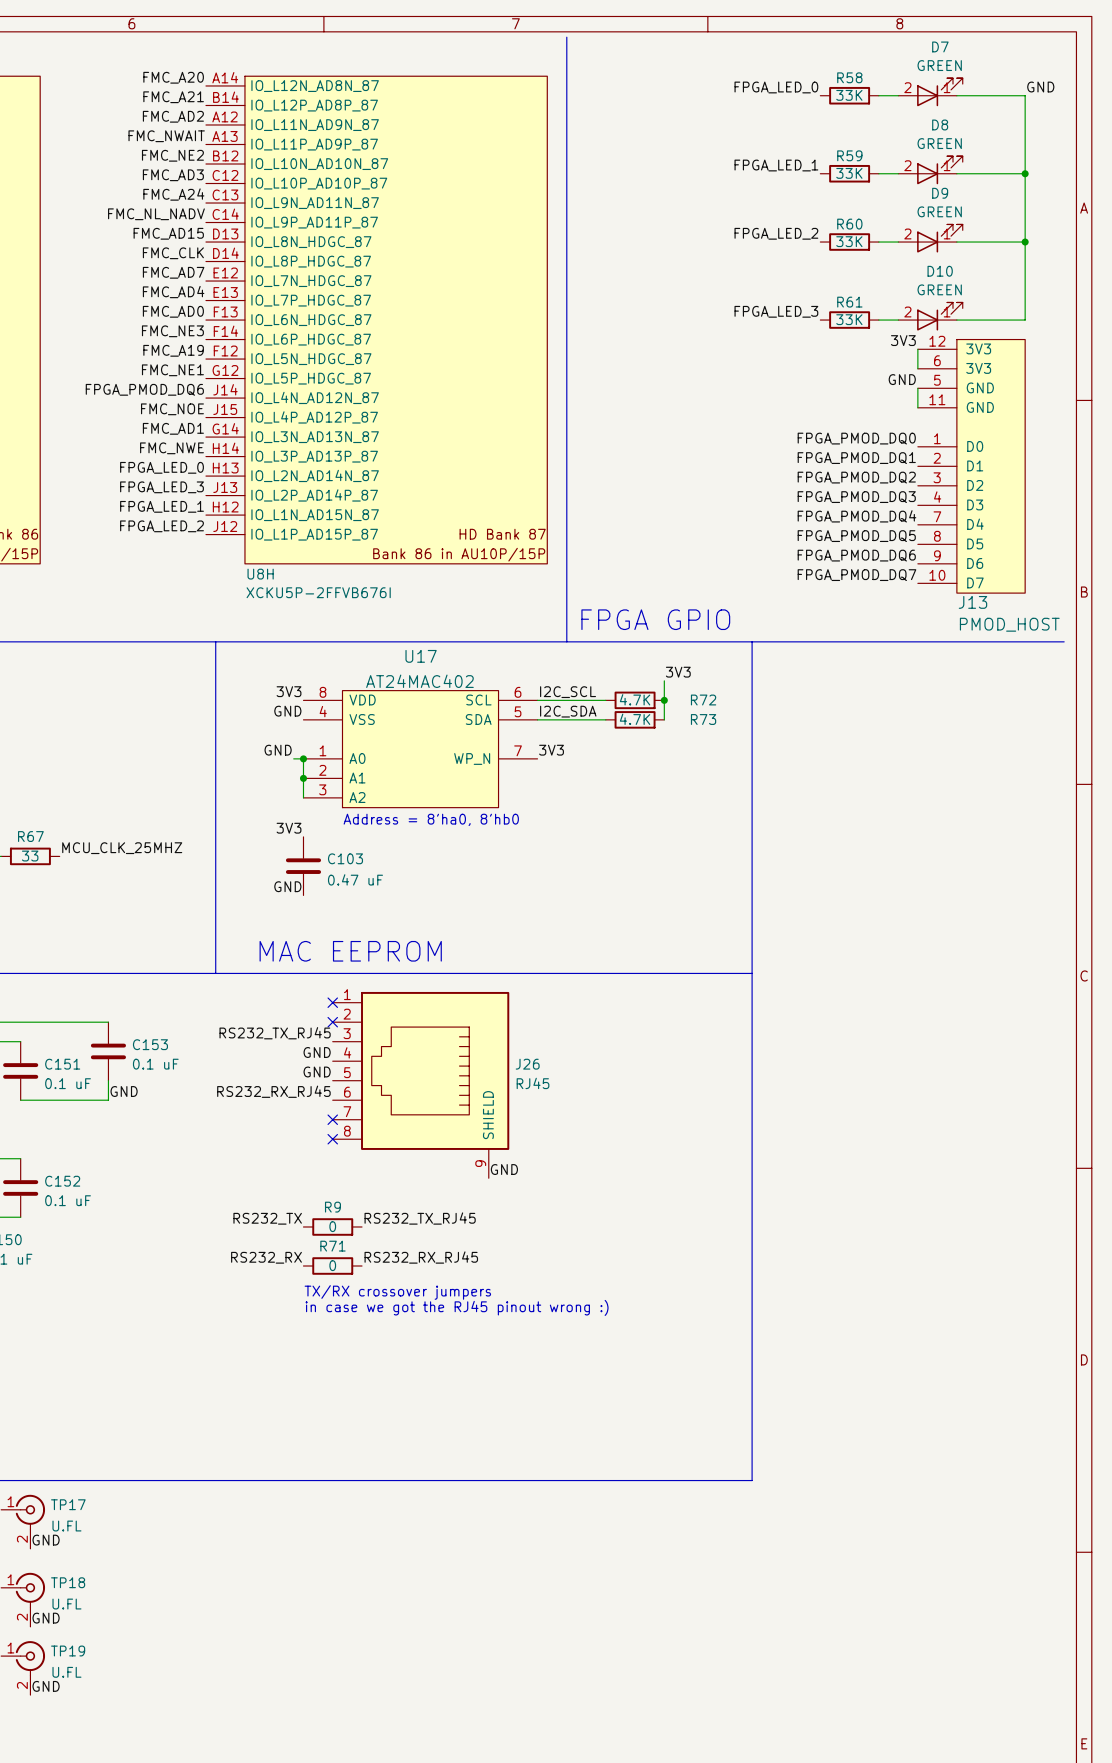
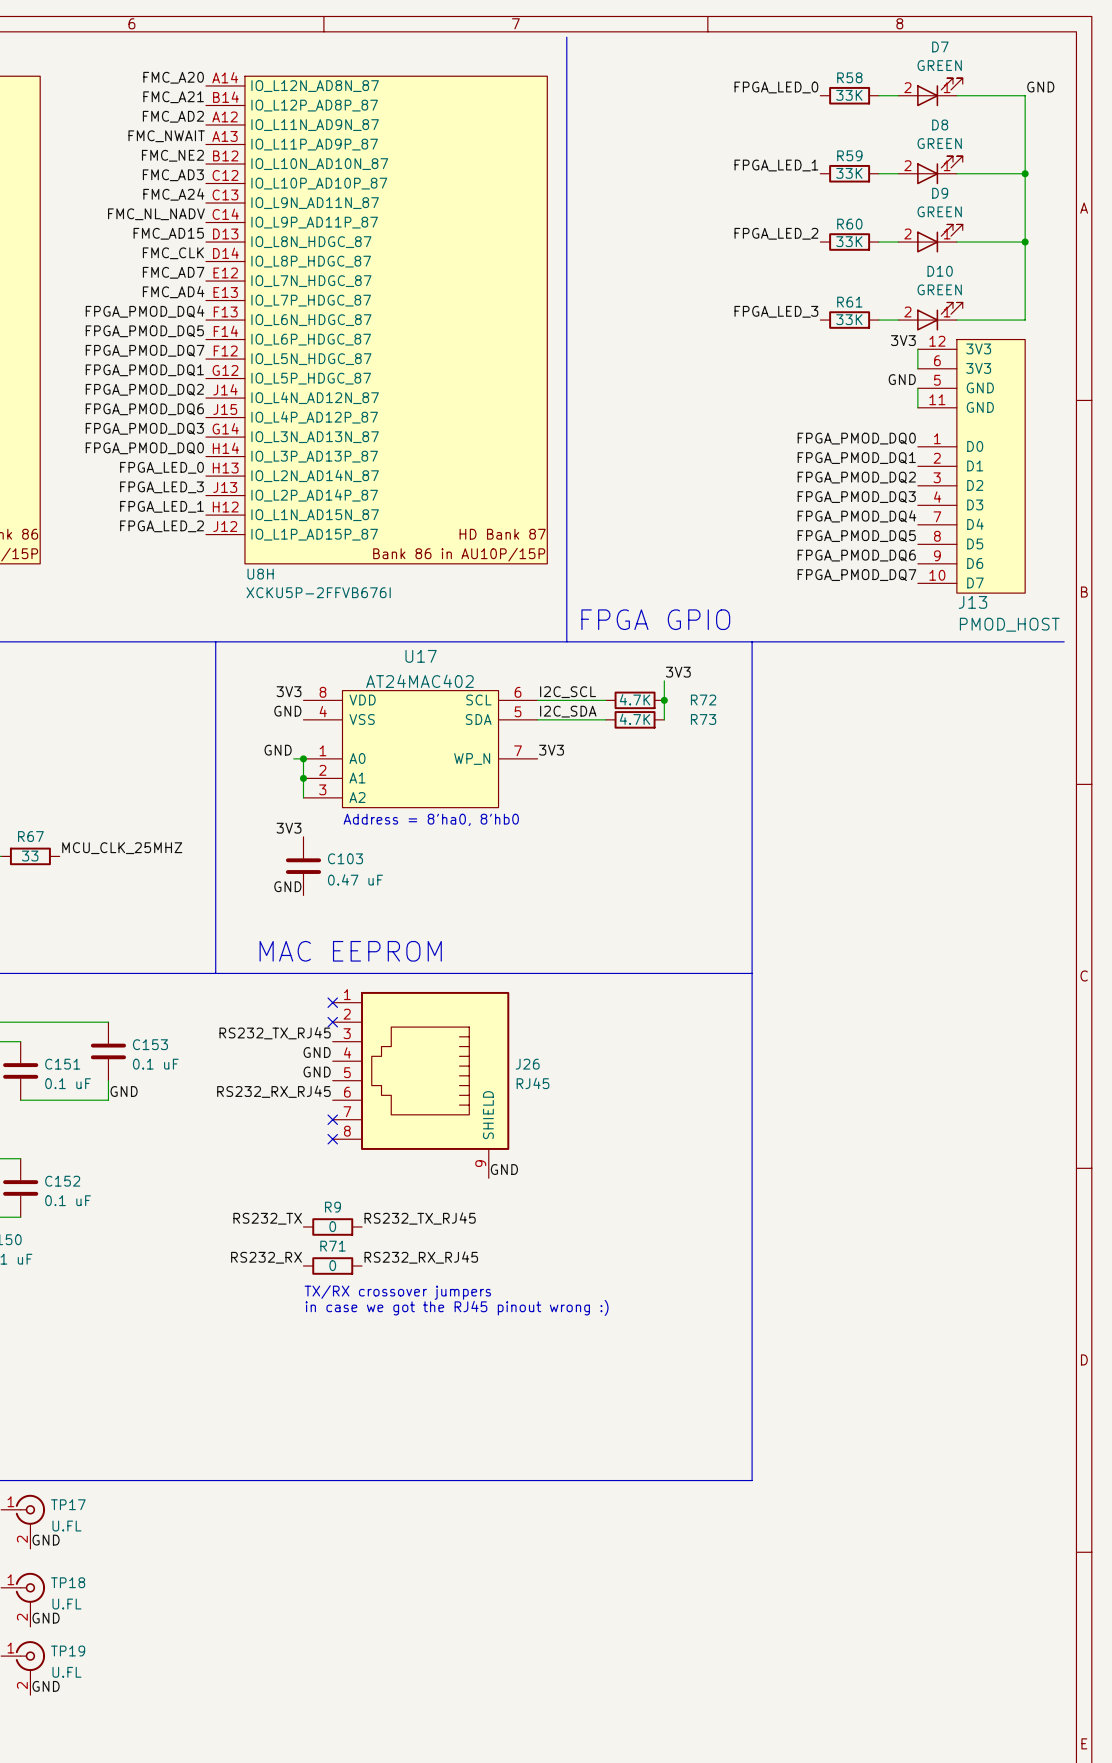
label: FMC_AD0 (173, 311) -> FPGA_PMOD_DQ4 (145, 311)
label: FMC_NE3 (172, 331) -> FPGA_PMOD_DQ5 (144, 331)
label: FMC_A19 (173, 350) -> FPGA_PMOD_DQ7 (145, 350)
label: FMC_NE1 (172, 370) -> FPGA_PMOD_DQ1 (144, 370)
label: FPGA_PMOD_DQ6 (144, 389) -> FPGA_PMOD_DQ2 (144, 389)
label: FMC_NOE (172, 409) -> FPGA_PMOD_DQ6 (144, 409)
label: FMC_AD1 (173, 428) -> FPGA_PMOD_DQ3 (144, 428)
label: FMC_NWE (171, 448) -> FPGA_PMOD_DQ0 (144, 448)

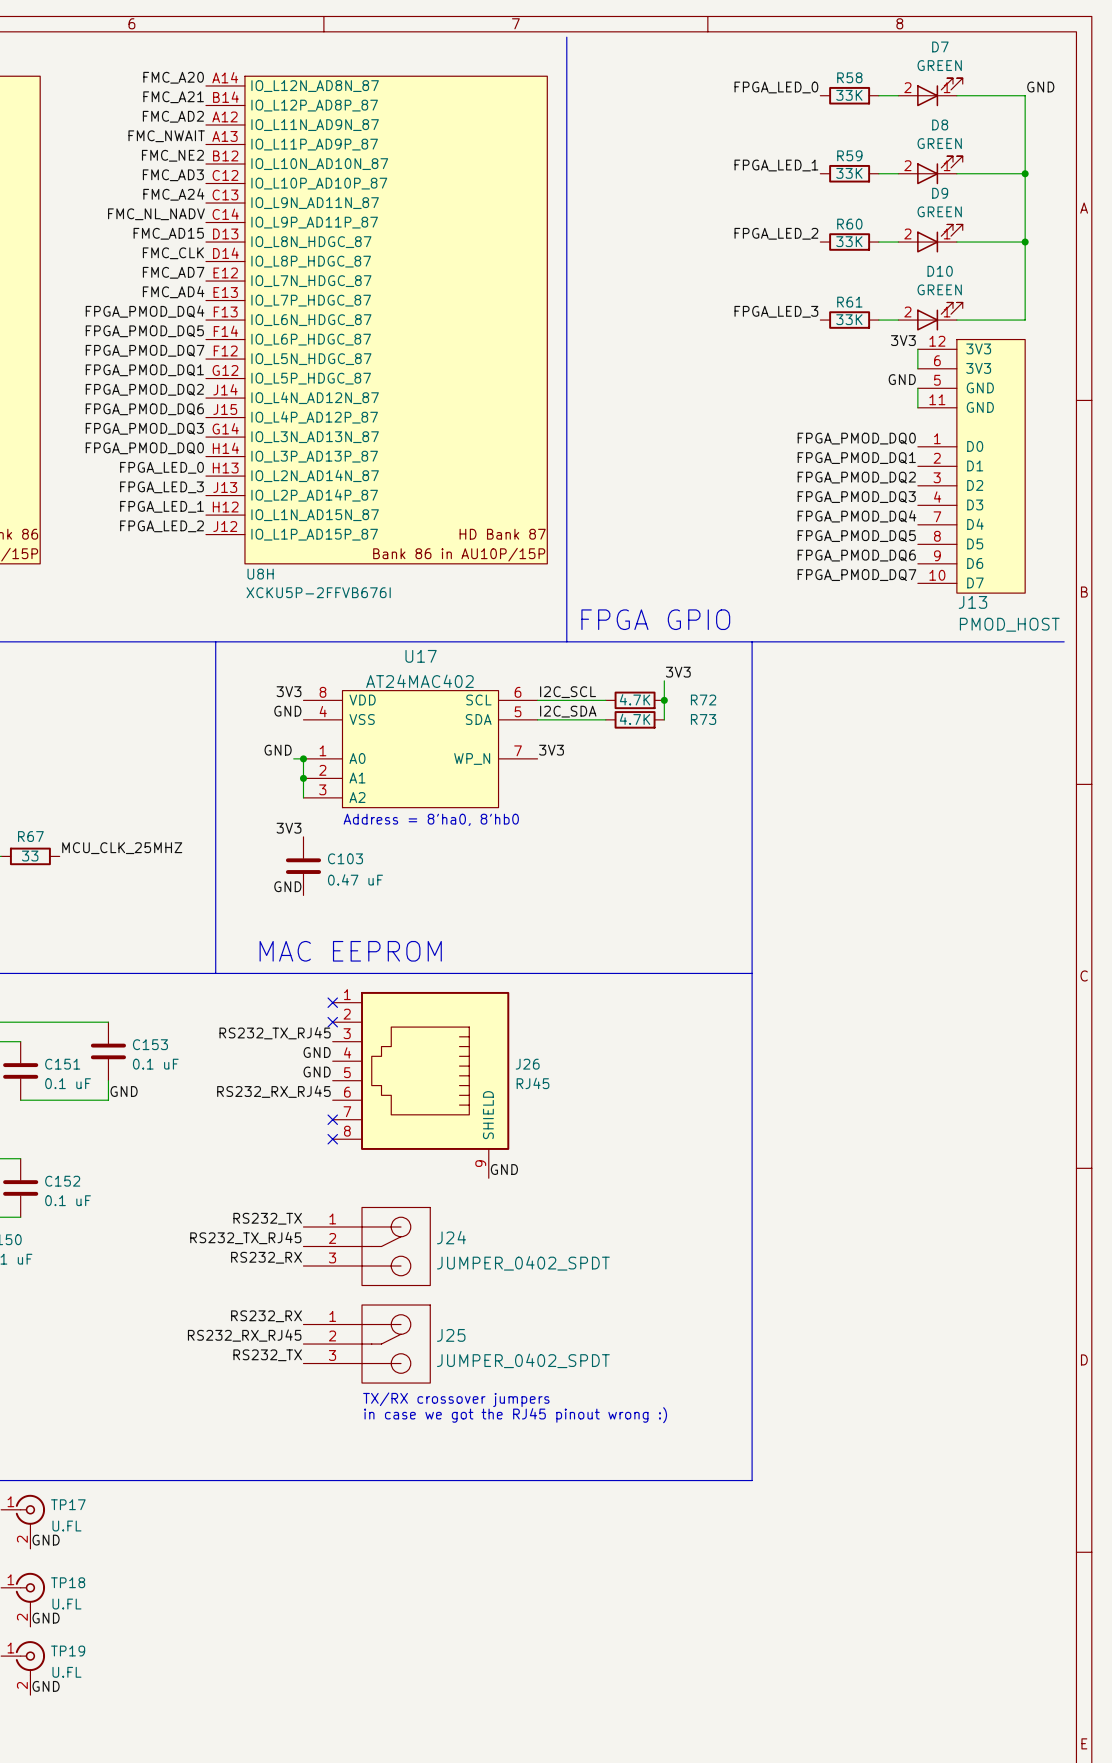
label position: RS232_TX_RJ45 (420, 1218) -> RS232_TX_RJ45 (245, 1238)
R9: 0 (332, 1226) -> none
J24: none -> JUMPER_0402_SPDT (366, 1246)
label position: RS232_RX_RJ45 (421, 1257) -> RS232_RX_RJ45 (244, 1335)
R71: 0 (332, 1266) -> none
text position: TX/RX crossover jumpers (397, 1292) -> TX/RX crossover jumpers (456, 1399)
text position: in case we got the RJ45 pinout wrong :) (457, 1307) -> in case we got the RJ45 pinout wrong :) (515, 1415)
label: none -> RS232_RX (266, 1316)
J25: none -> JUMPER_0402_SPDT (366, 1344)
label: none -> RS232_TX (267, 1355)

